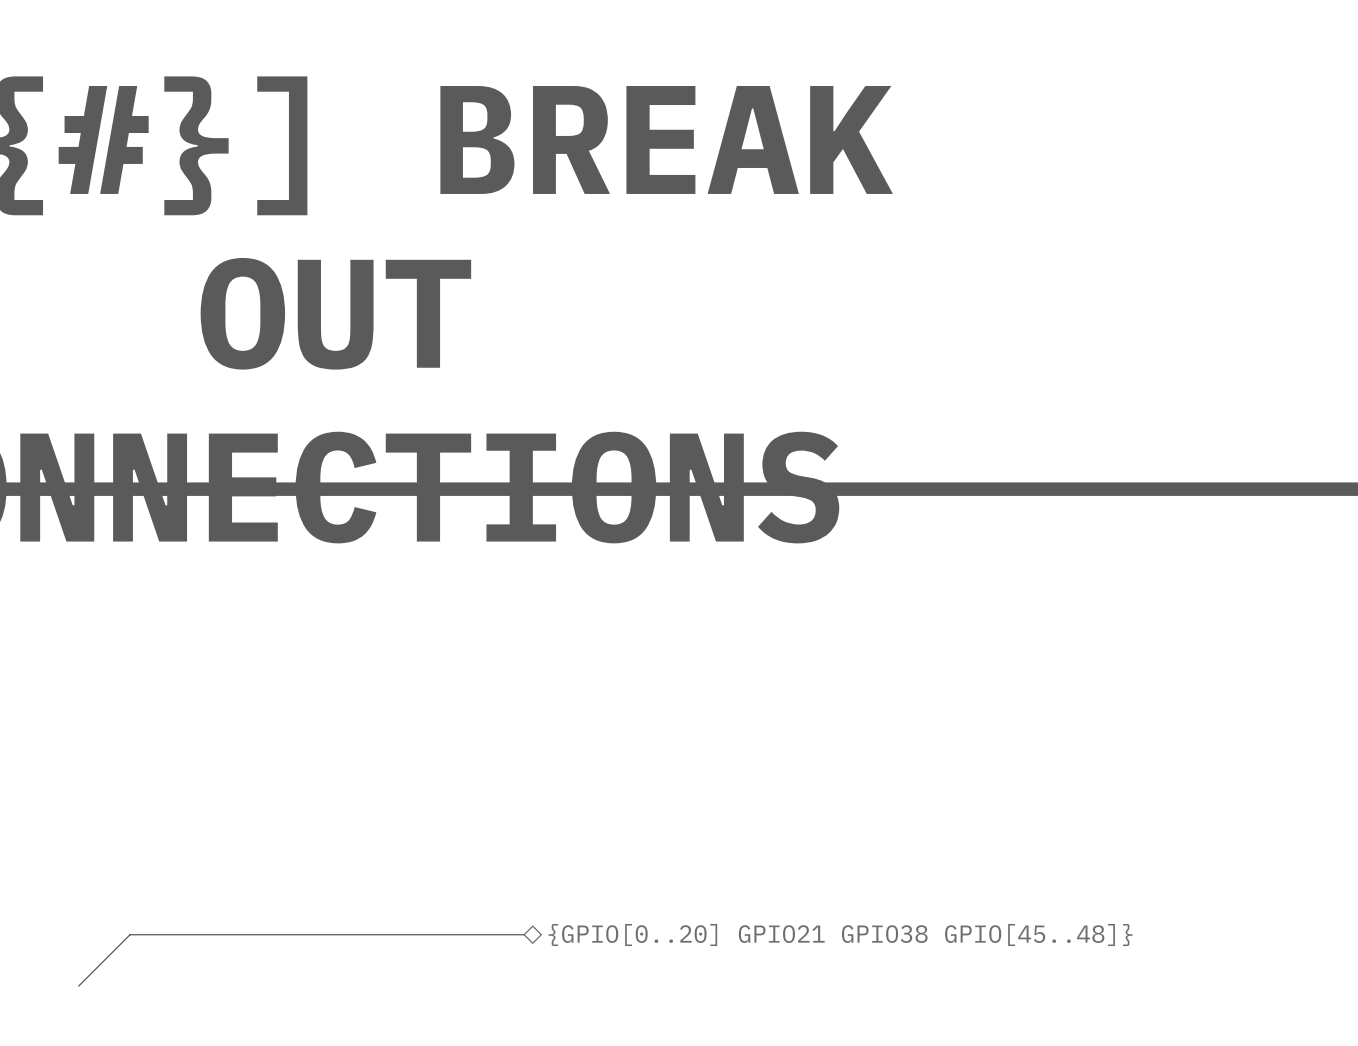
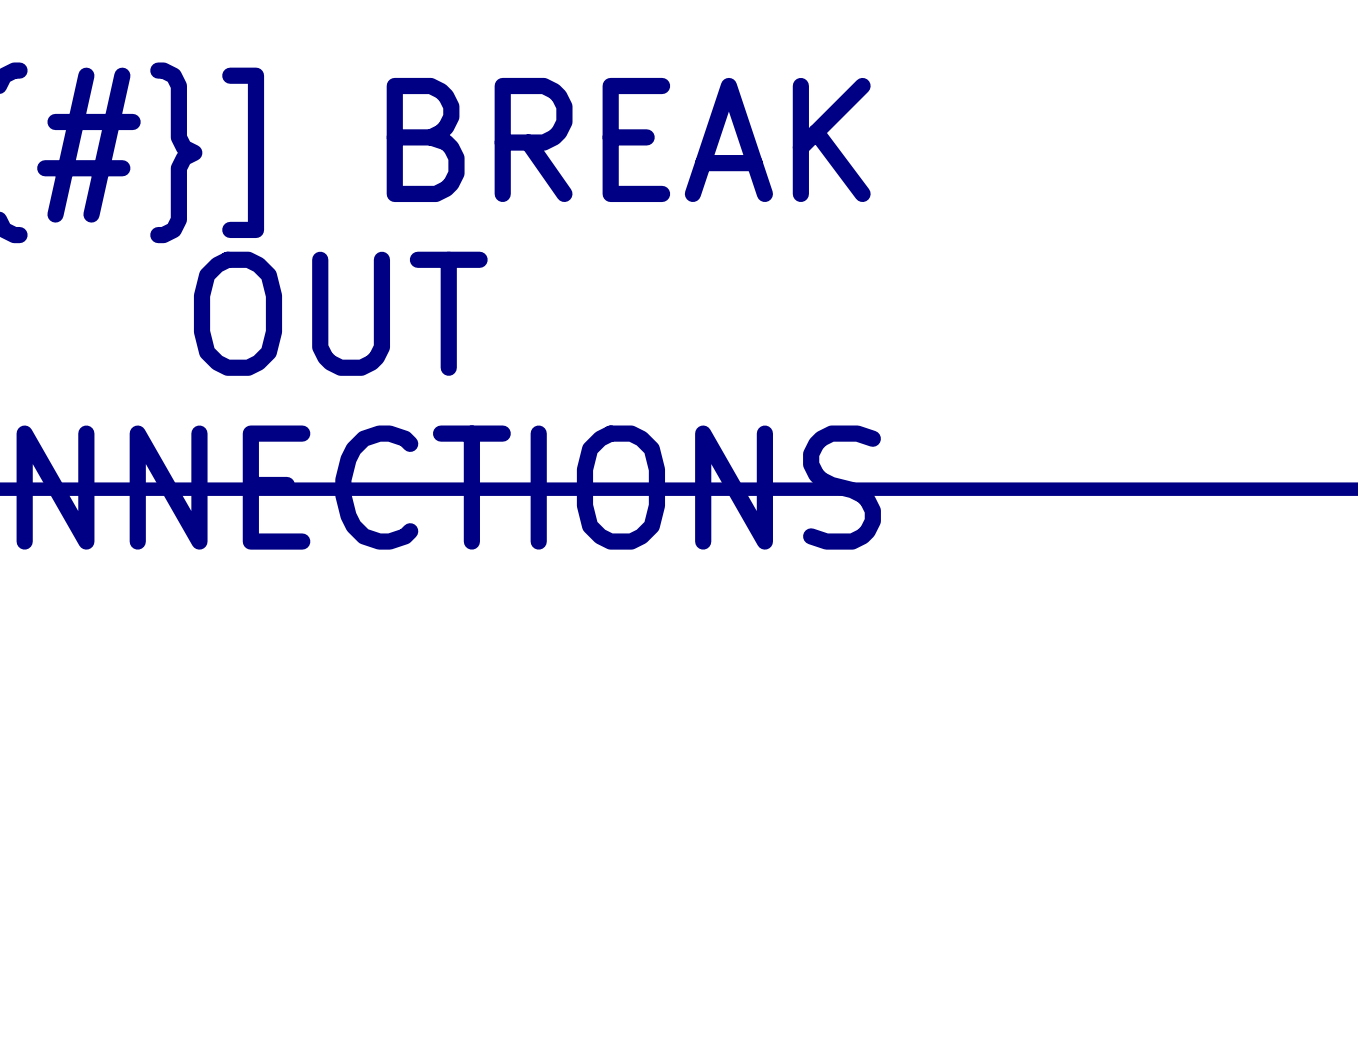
bus: (524, 934) (130, 934) (78, 986) -> none
hierarchical label: {GPIO[0..20] GPIO21 GPIO38 GPIO[45..48]} (840, 935) -> none

